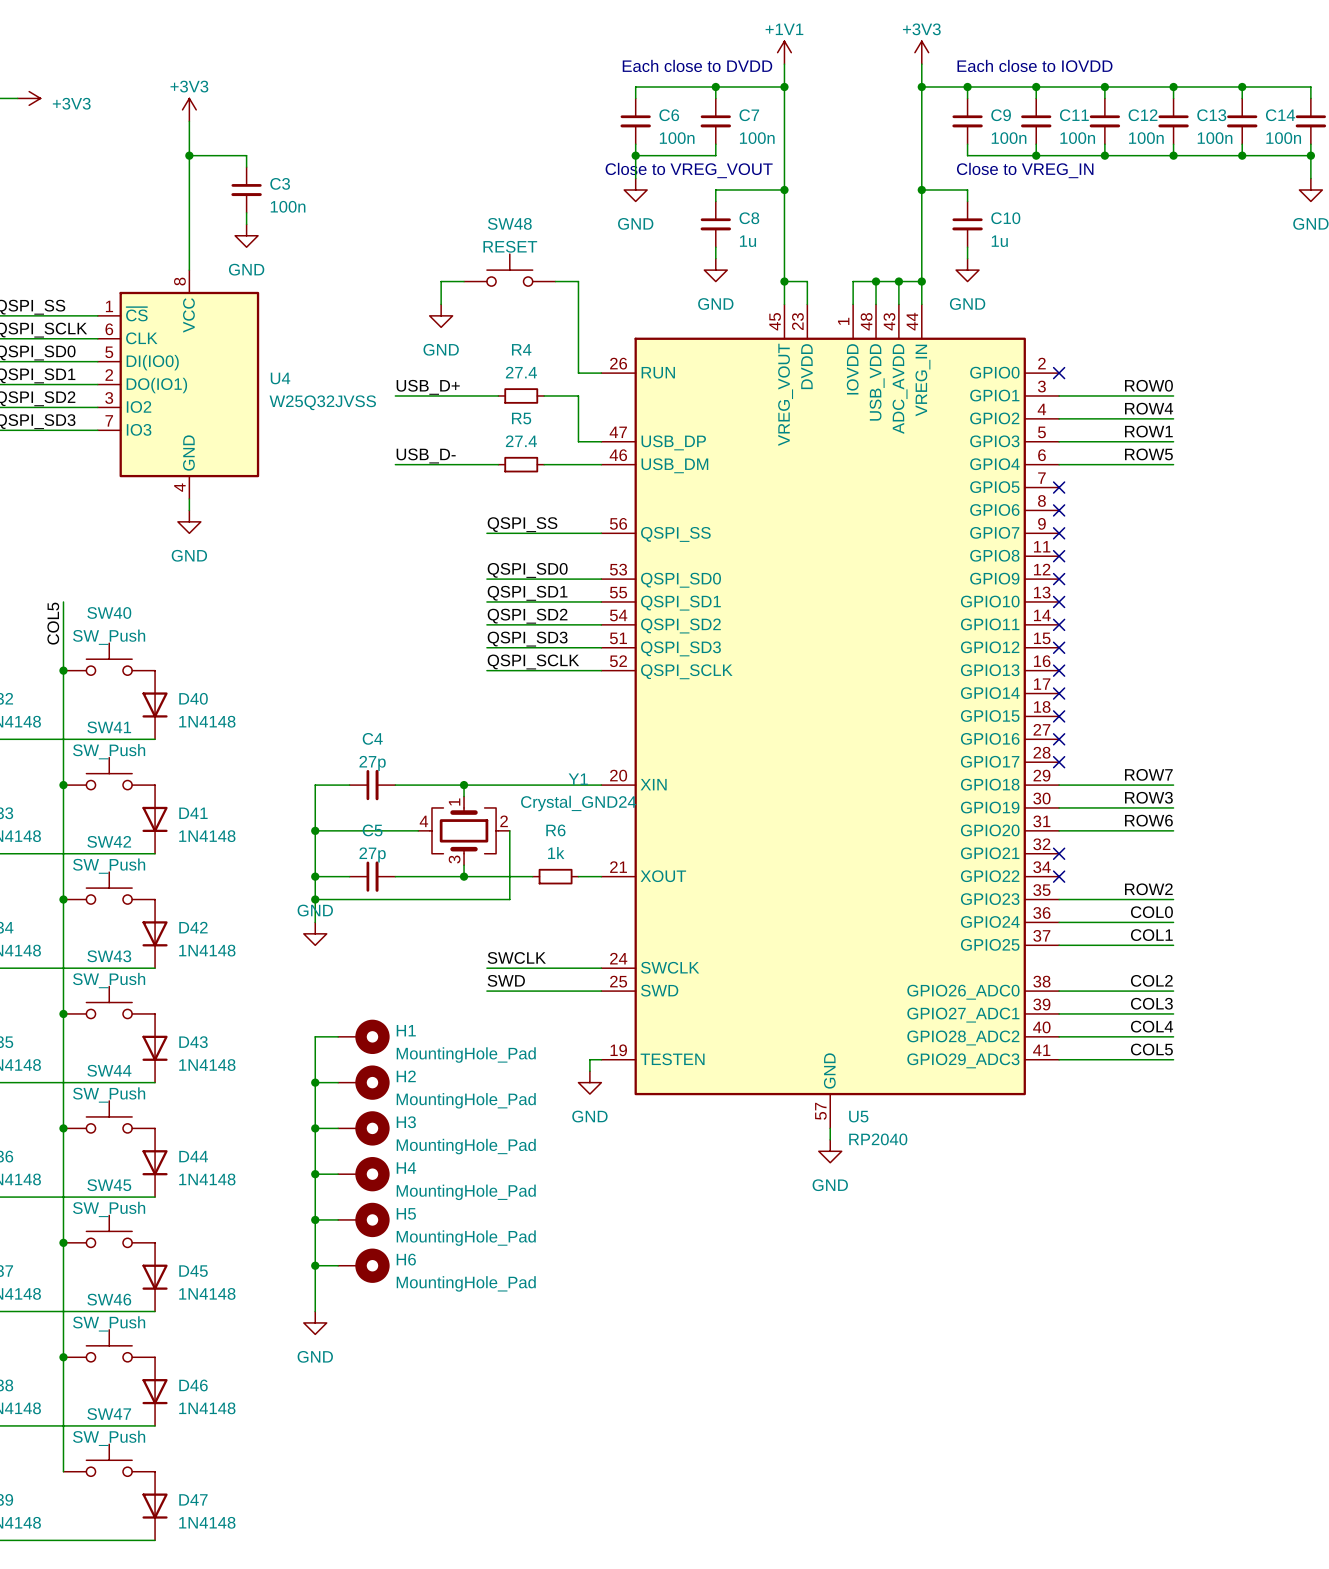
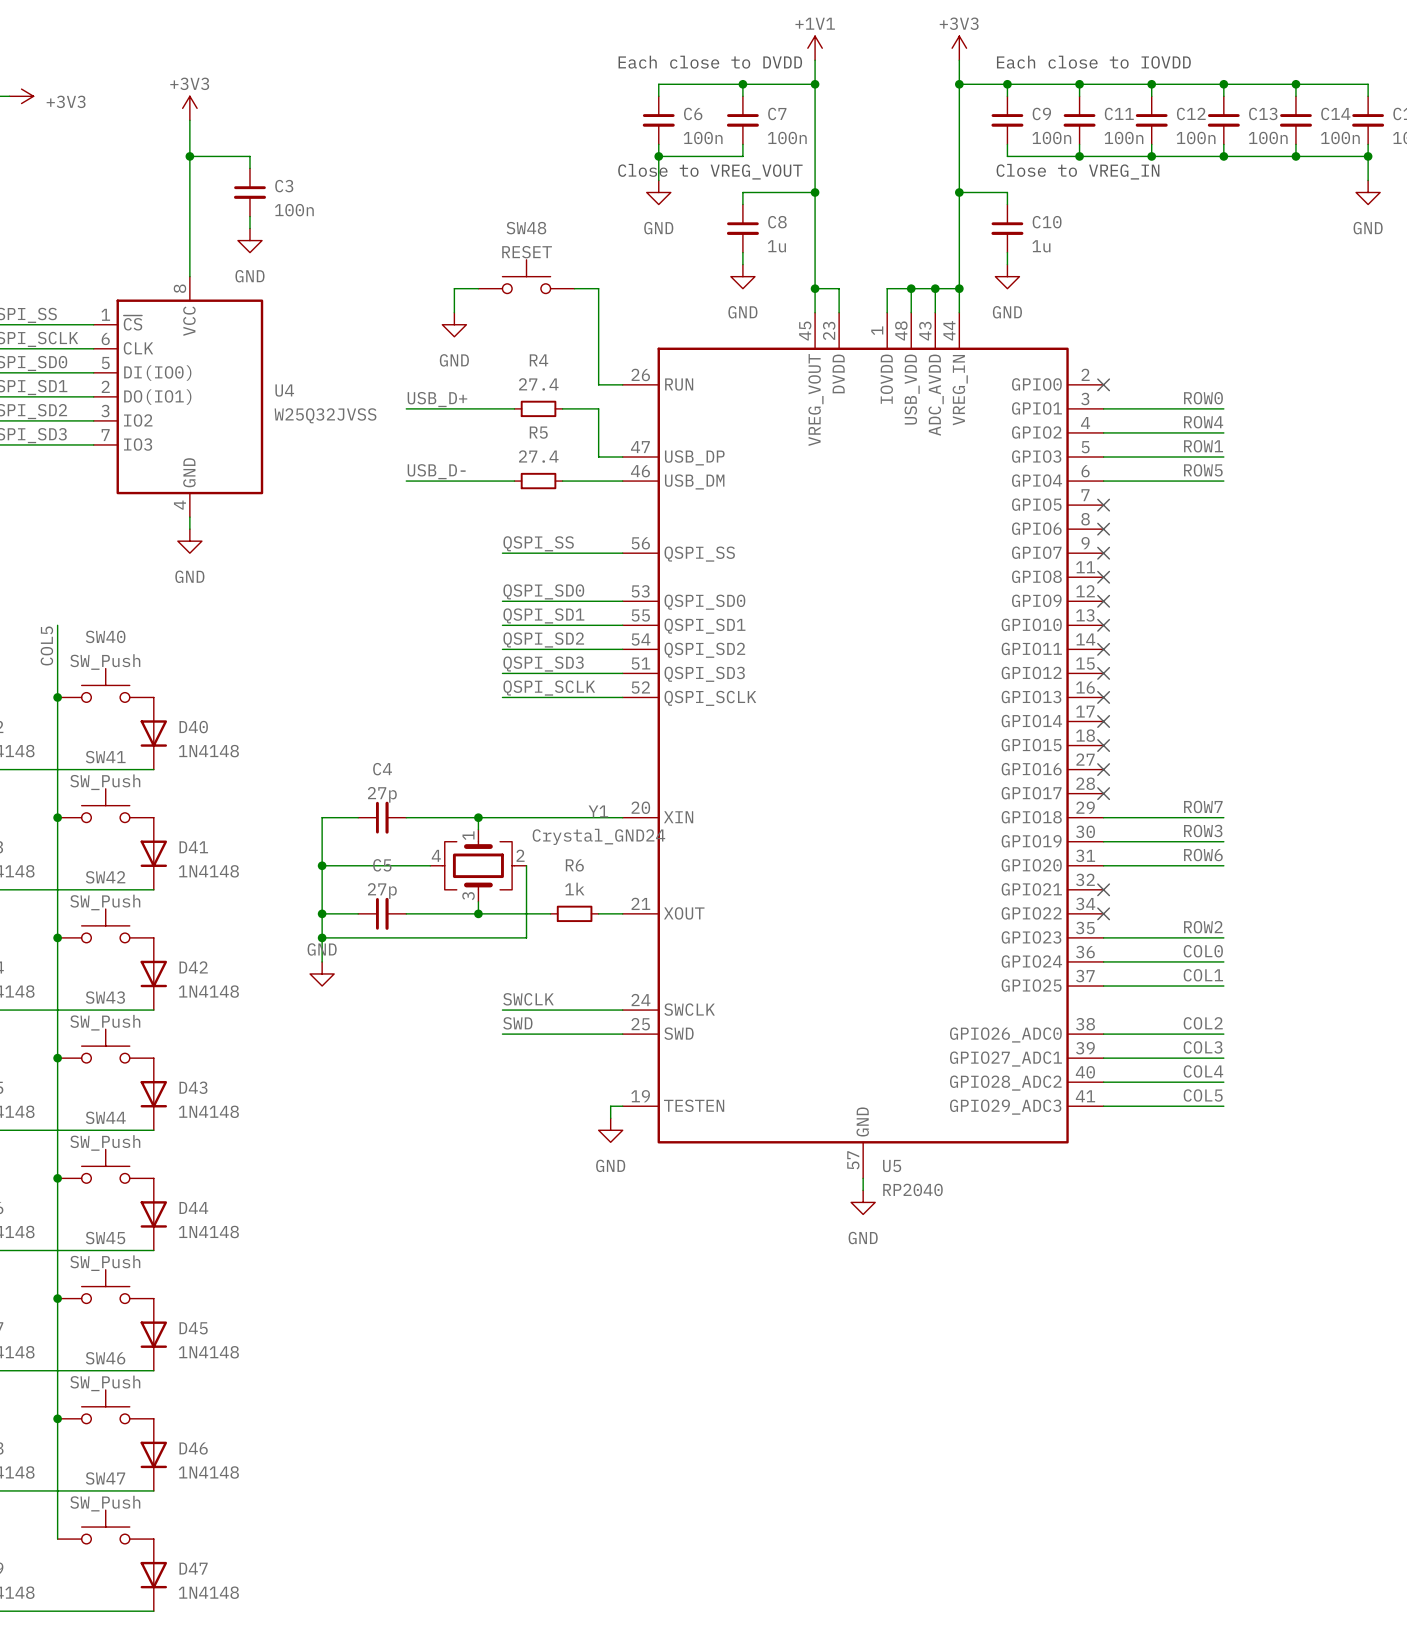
wire: (338, 1036) (315, 1036) (315, 1311) -> none
H1: MountingHole_Pad (363, 1036) -> none
wire: (315, 1082) (338, 1082) -> none
junction: (315, 1082) -> none
H2: MountingHole_Pad (363, 1082) -> none
wire: (315, 1128) (338, 1128) -> none
junction: (315, 1128) -> none
H3: MountingHole_Pad (363, 1128) -> none
wire: (315, 1174) (338, 1174) -> none
junction: (315, 1174) -> none
H4: MountingHole_Pad (363, 1174) -> none
wire: (315, 1219) (338, 1219) -> none
junction: (315, 1219) -> none
H5: MountingHole_Pad (363, 1219) -> none
wire: (315, 1265) (338, 1265) -> none
junction: (315, 1265) -> none
H6: MountingHole_Pad (363, 1265) -> none
power symbol: GND (315, 1322) -> none

